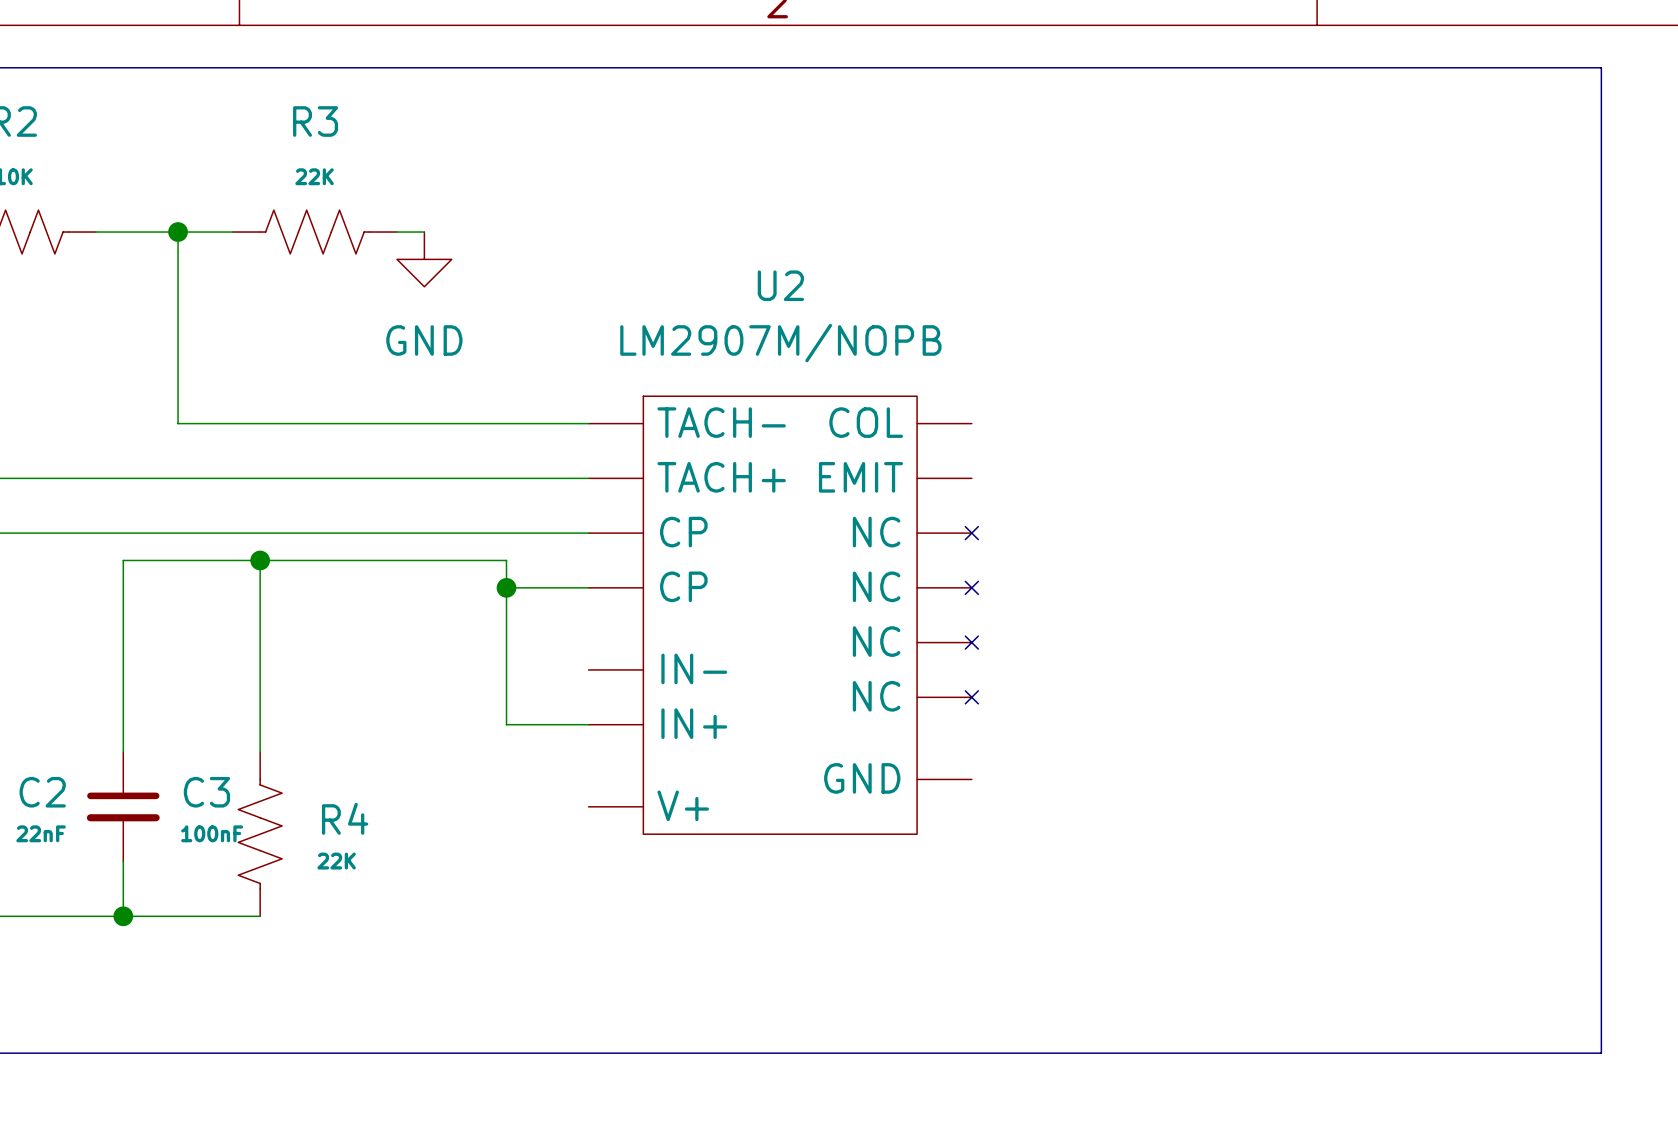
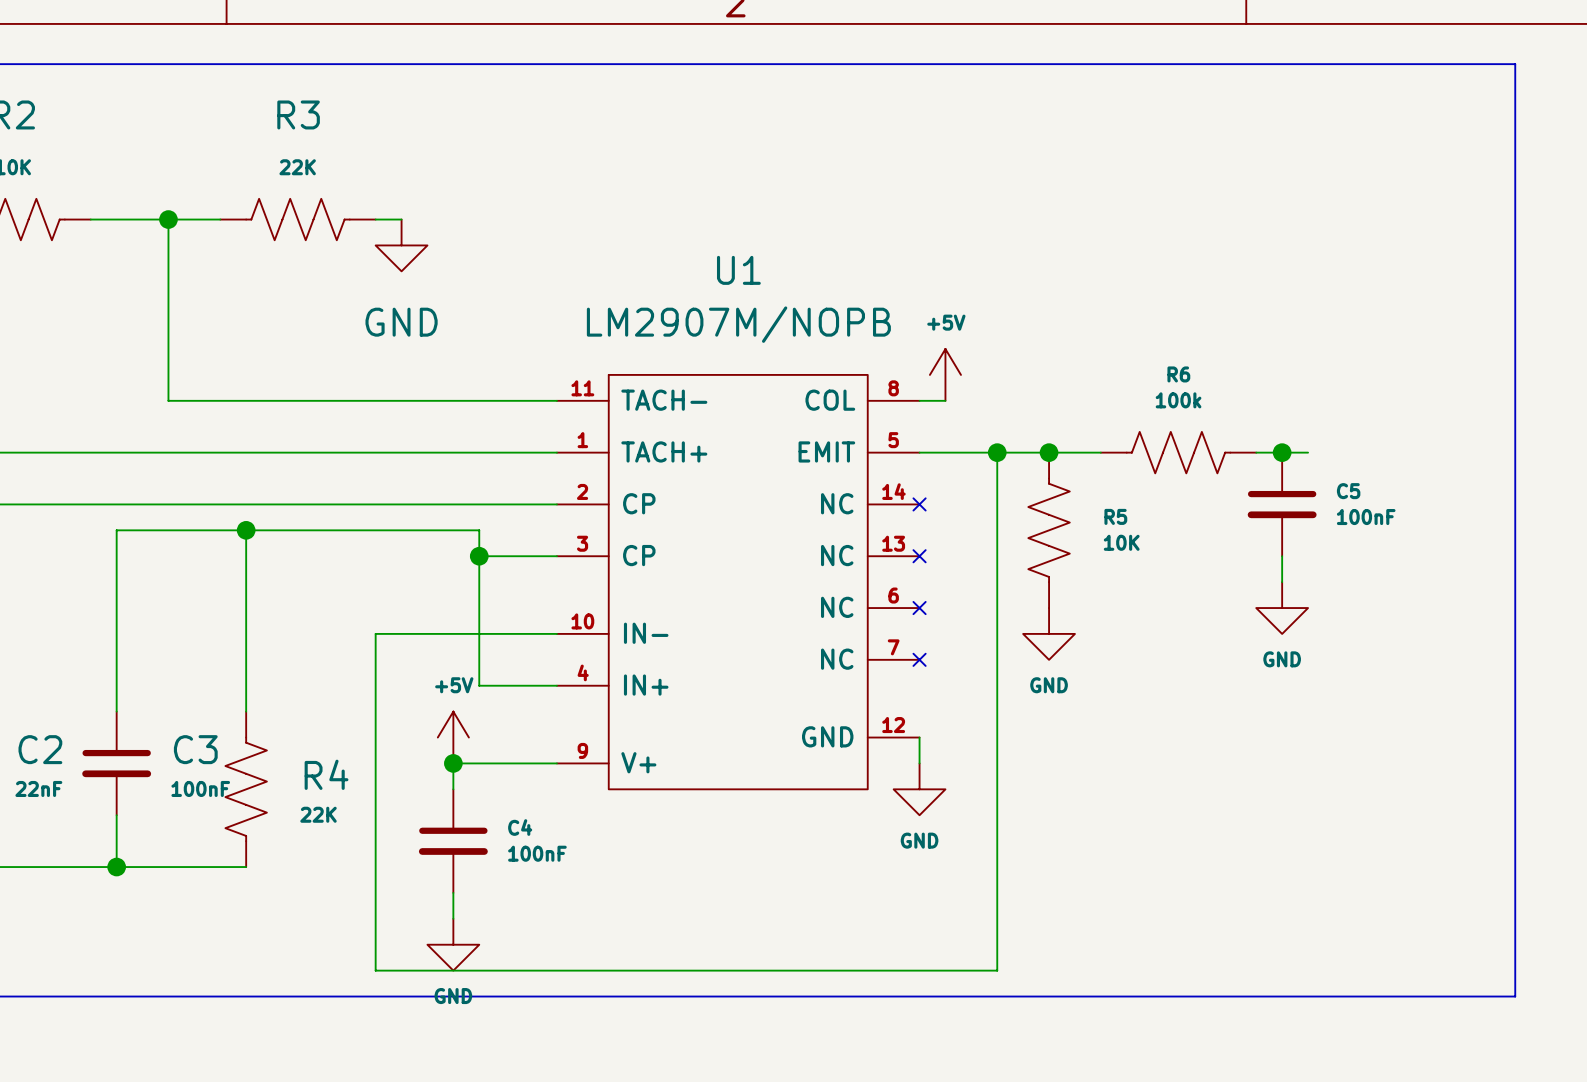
U2 name: U2 (780, 285) -> U1 (738, 270)
U2 symbol: [588, 396, 979, 835] -> [556, 374, 926, 790]
power symbol: none -> +5V (945, 374)
wire: none -> (919, 400) (945, 400)
wire: none -> (919, 452) (1100, 452)
wire: none -> (997, 452) (997, 970) (375, 970) (375, 633) (556, 633)
junction: none -> (997, 452)
junction: none -> (1049, 452)
R6: none -> 100k (1178, 452)
wire: none -> (1256, 452) (1308, 452)
junction: none -> (1282, 452)
C5: none -> 100nF (1282, 504)
R5: none -> 10K (1049, 530)
wire: none -> (1282, 556) (1282, 582)
power symbol: none -> GND (1282, 608)
power symbol: none -> GND (1049, 633)
power symbol: none -> +5V (453, 737)
wire: none -> (919, 737) (919, 763)
junction: none -> (453, 763)
wire: none -> (556, 763) (453, 763) (453, 789)
power symbol: none -> GND (919, 789)
C4: none -> 100nF (453, 841)
wire: none -> (453, 892) (453, 918)
power symbol: none -> GND (453, 944)

